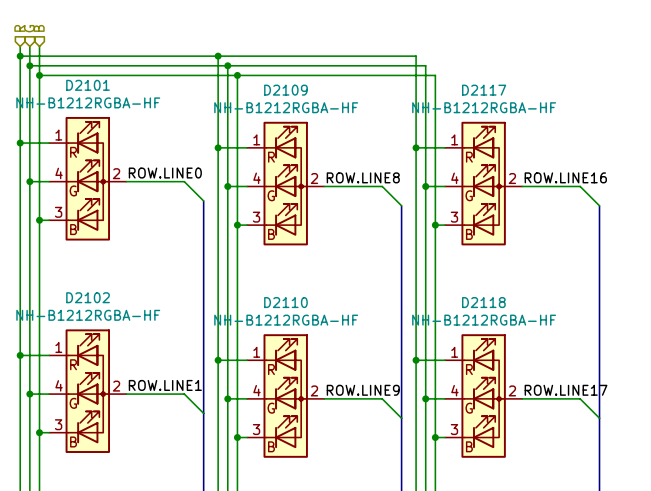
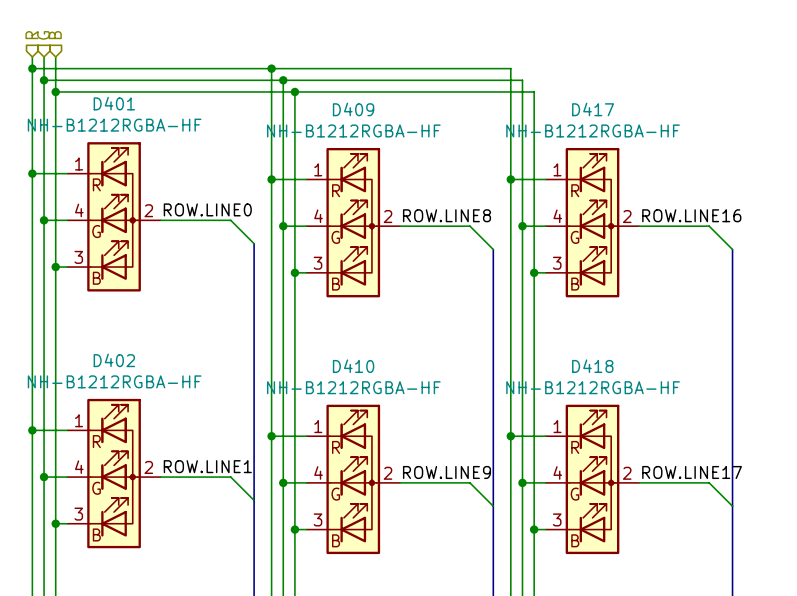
D2101 name: D2101 (88, 85) -> D401 (114, 103)
D2109 name: D2109 (285, 90) -> D409 (353, 109)
D2117 name: D2117 (484, 90) -> D417 (593, 109)
D2102 name: D2102 (88, 297) -> D402 (114, 360)
D2110 name: D2110 (285, 302) -> D410 (353, 366)
D2118 name: D2118 (483, 302) -> D418 (592, 366)

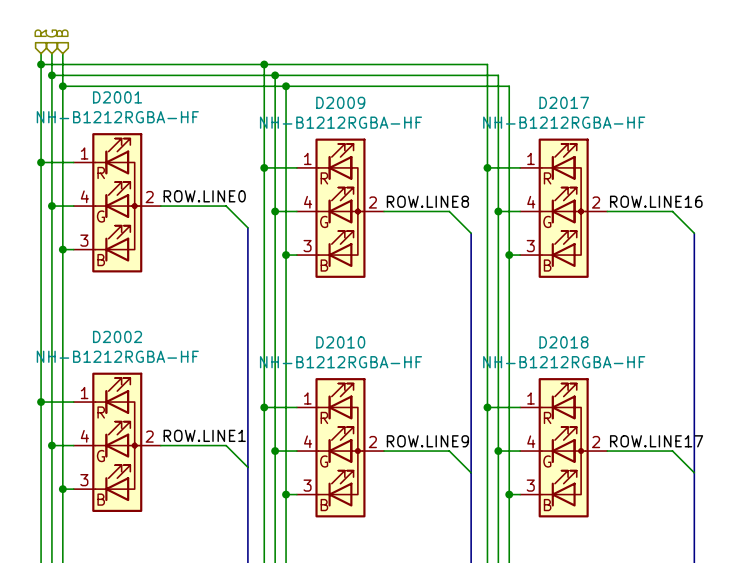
D401 name: D401 (114, 103) -> D2001 (117, 97)
D409 name: D409 (353, 109) -> D2009 (340, 102)
D417 name: D417 (593, 109) -> D2017 (564, 102)
D402 name: D402 (114, 360) -> D2002 (117, 336)
D410 name: D410 (353, 366) -> D2010 (340, 342)
D418 name: D418 (592, 366) -> D2018 (563, 342)

